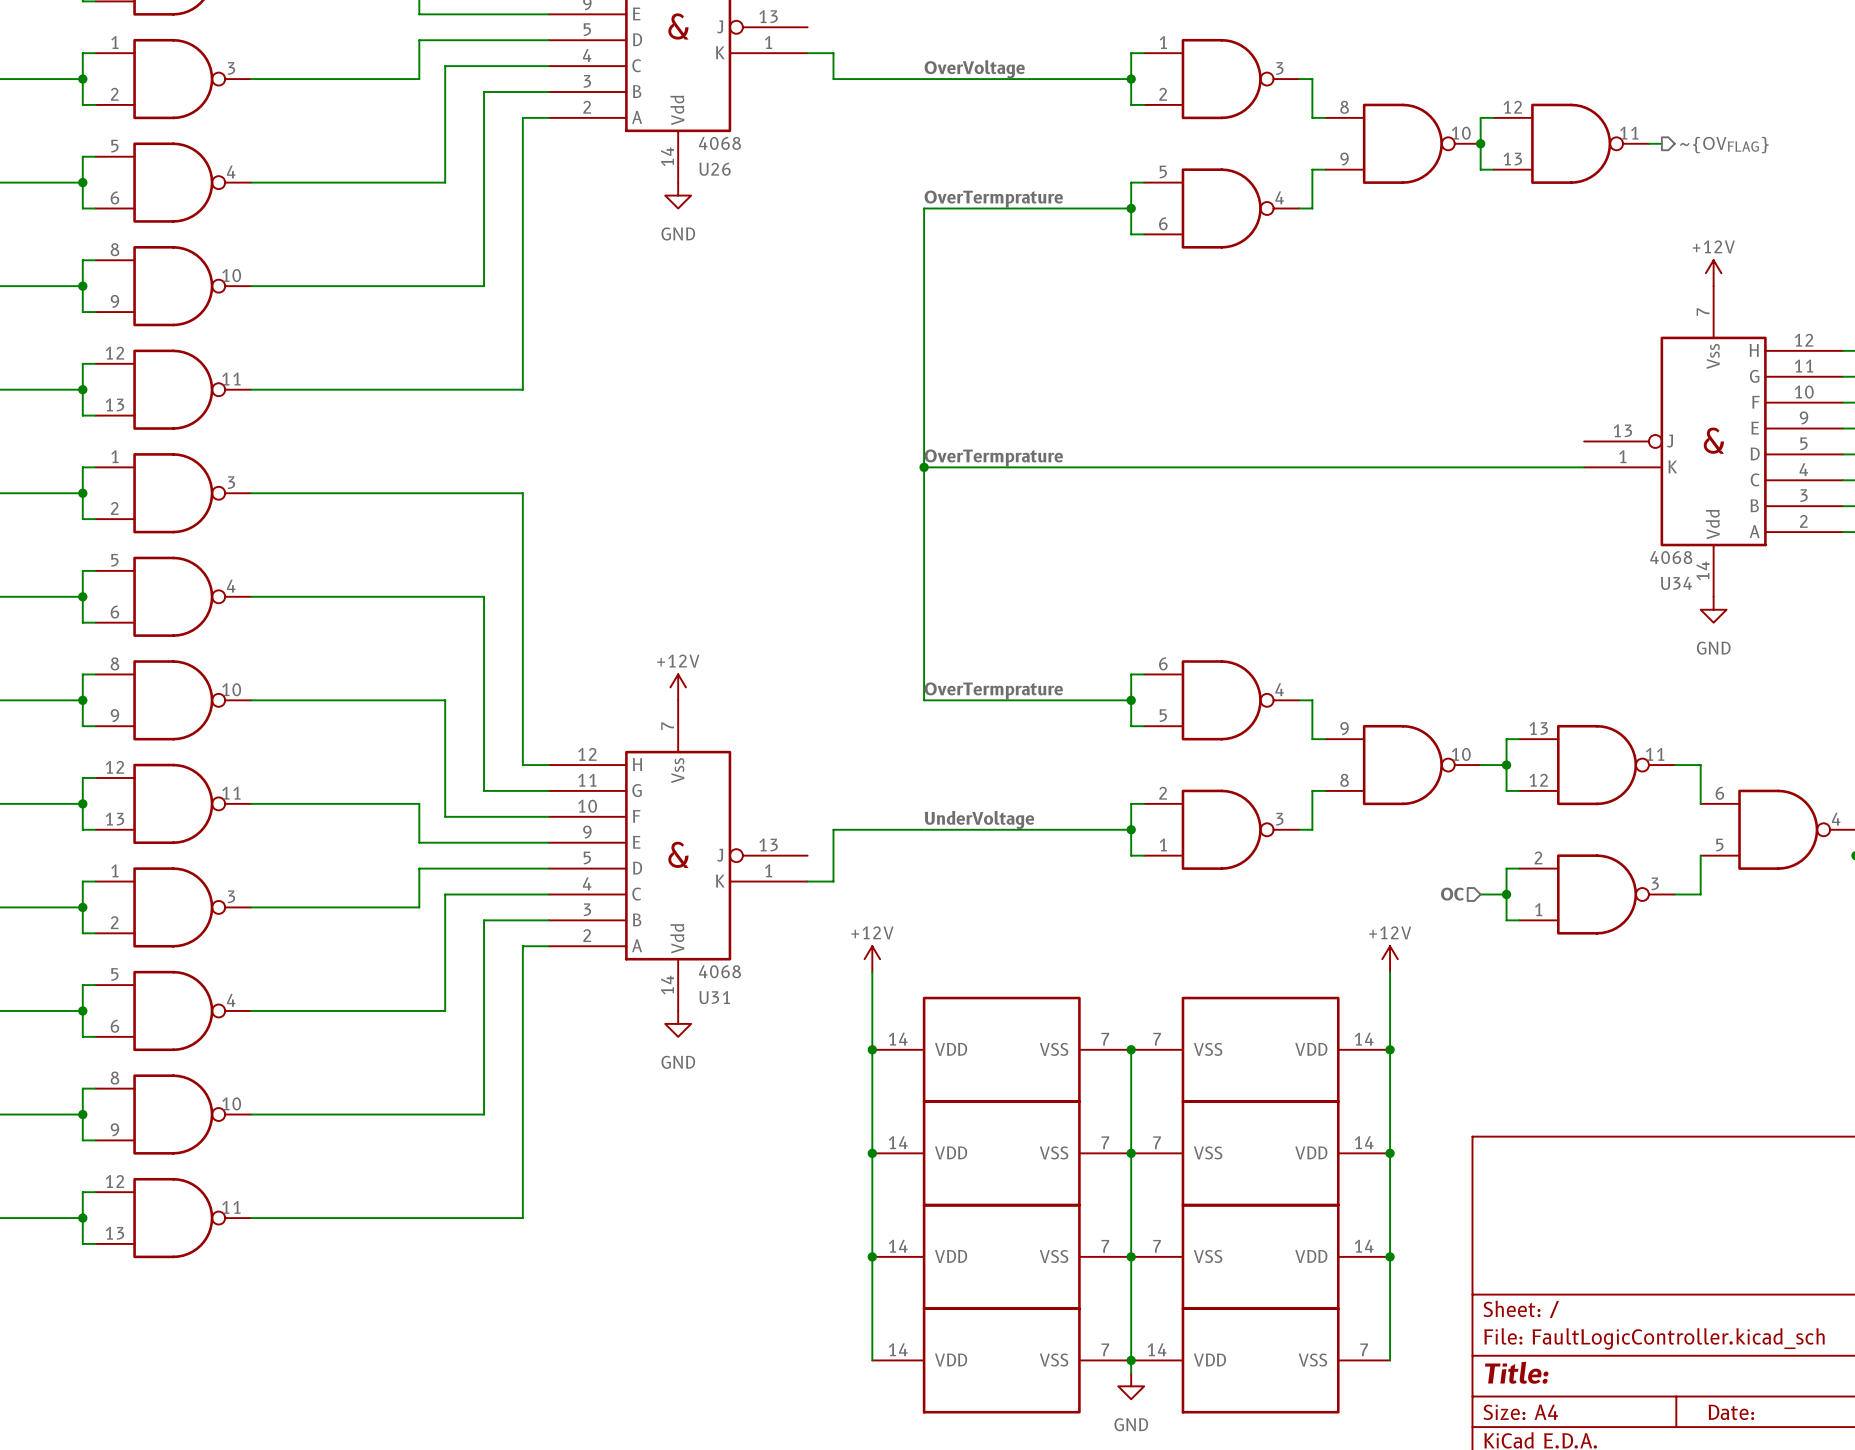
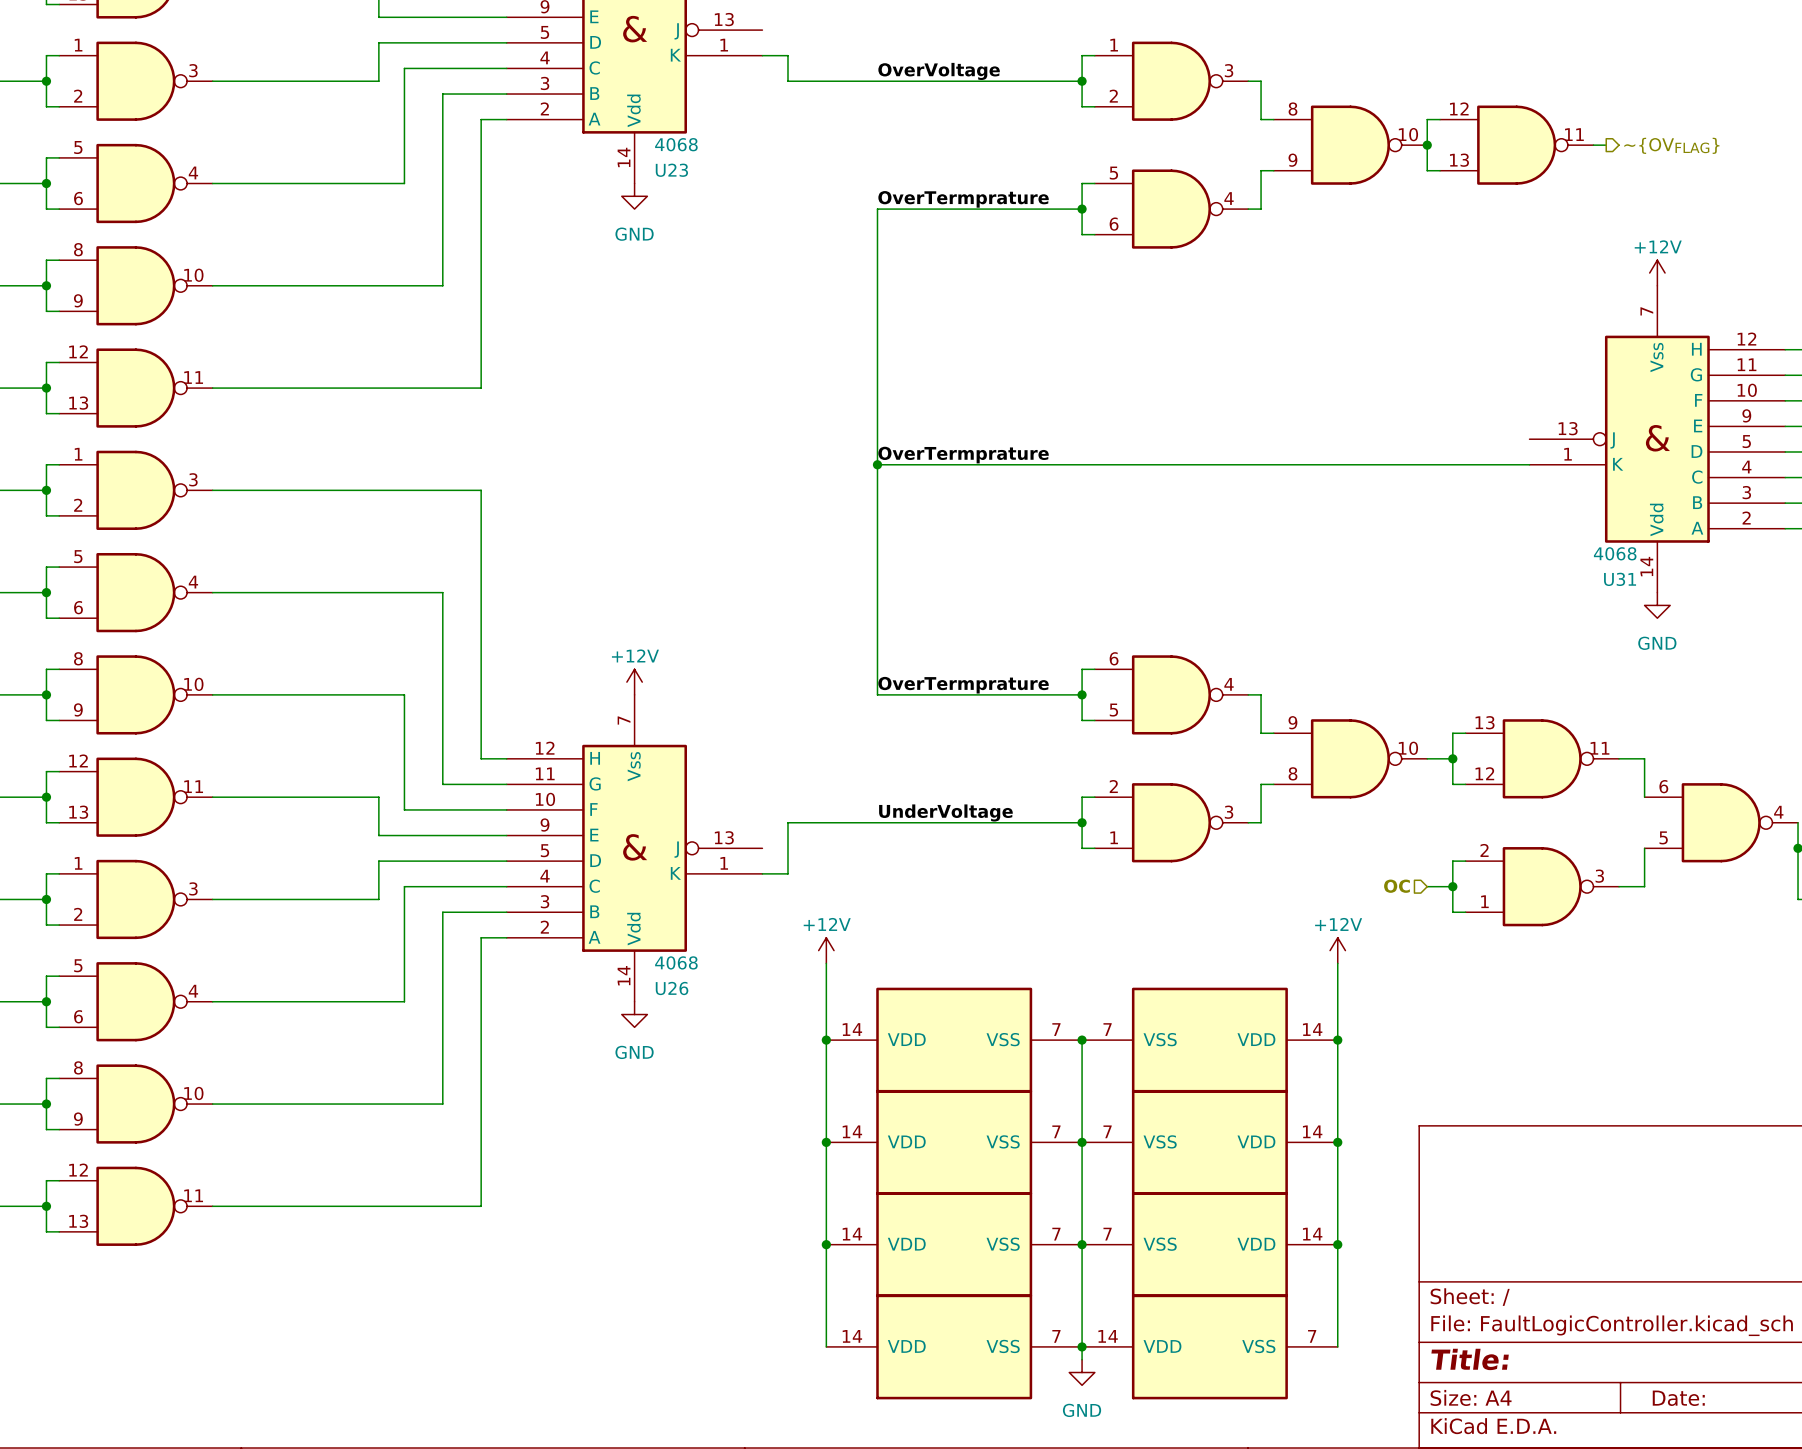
U26 name: U26 (715, 169) -> U23 (671, 170)
U34 name: U34 (1676, 583) -> U31 (1620, 579)
U31 name: U31 (714, 997) -> U26 (672, 988)

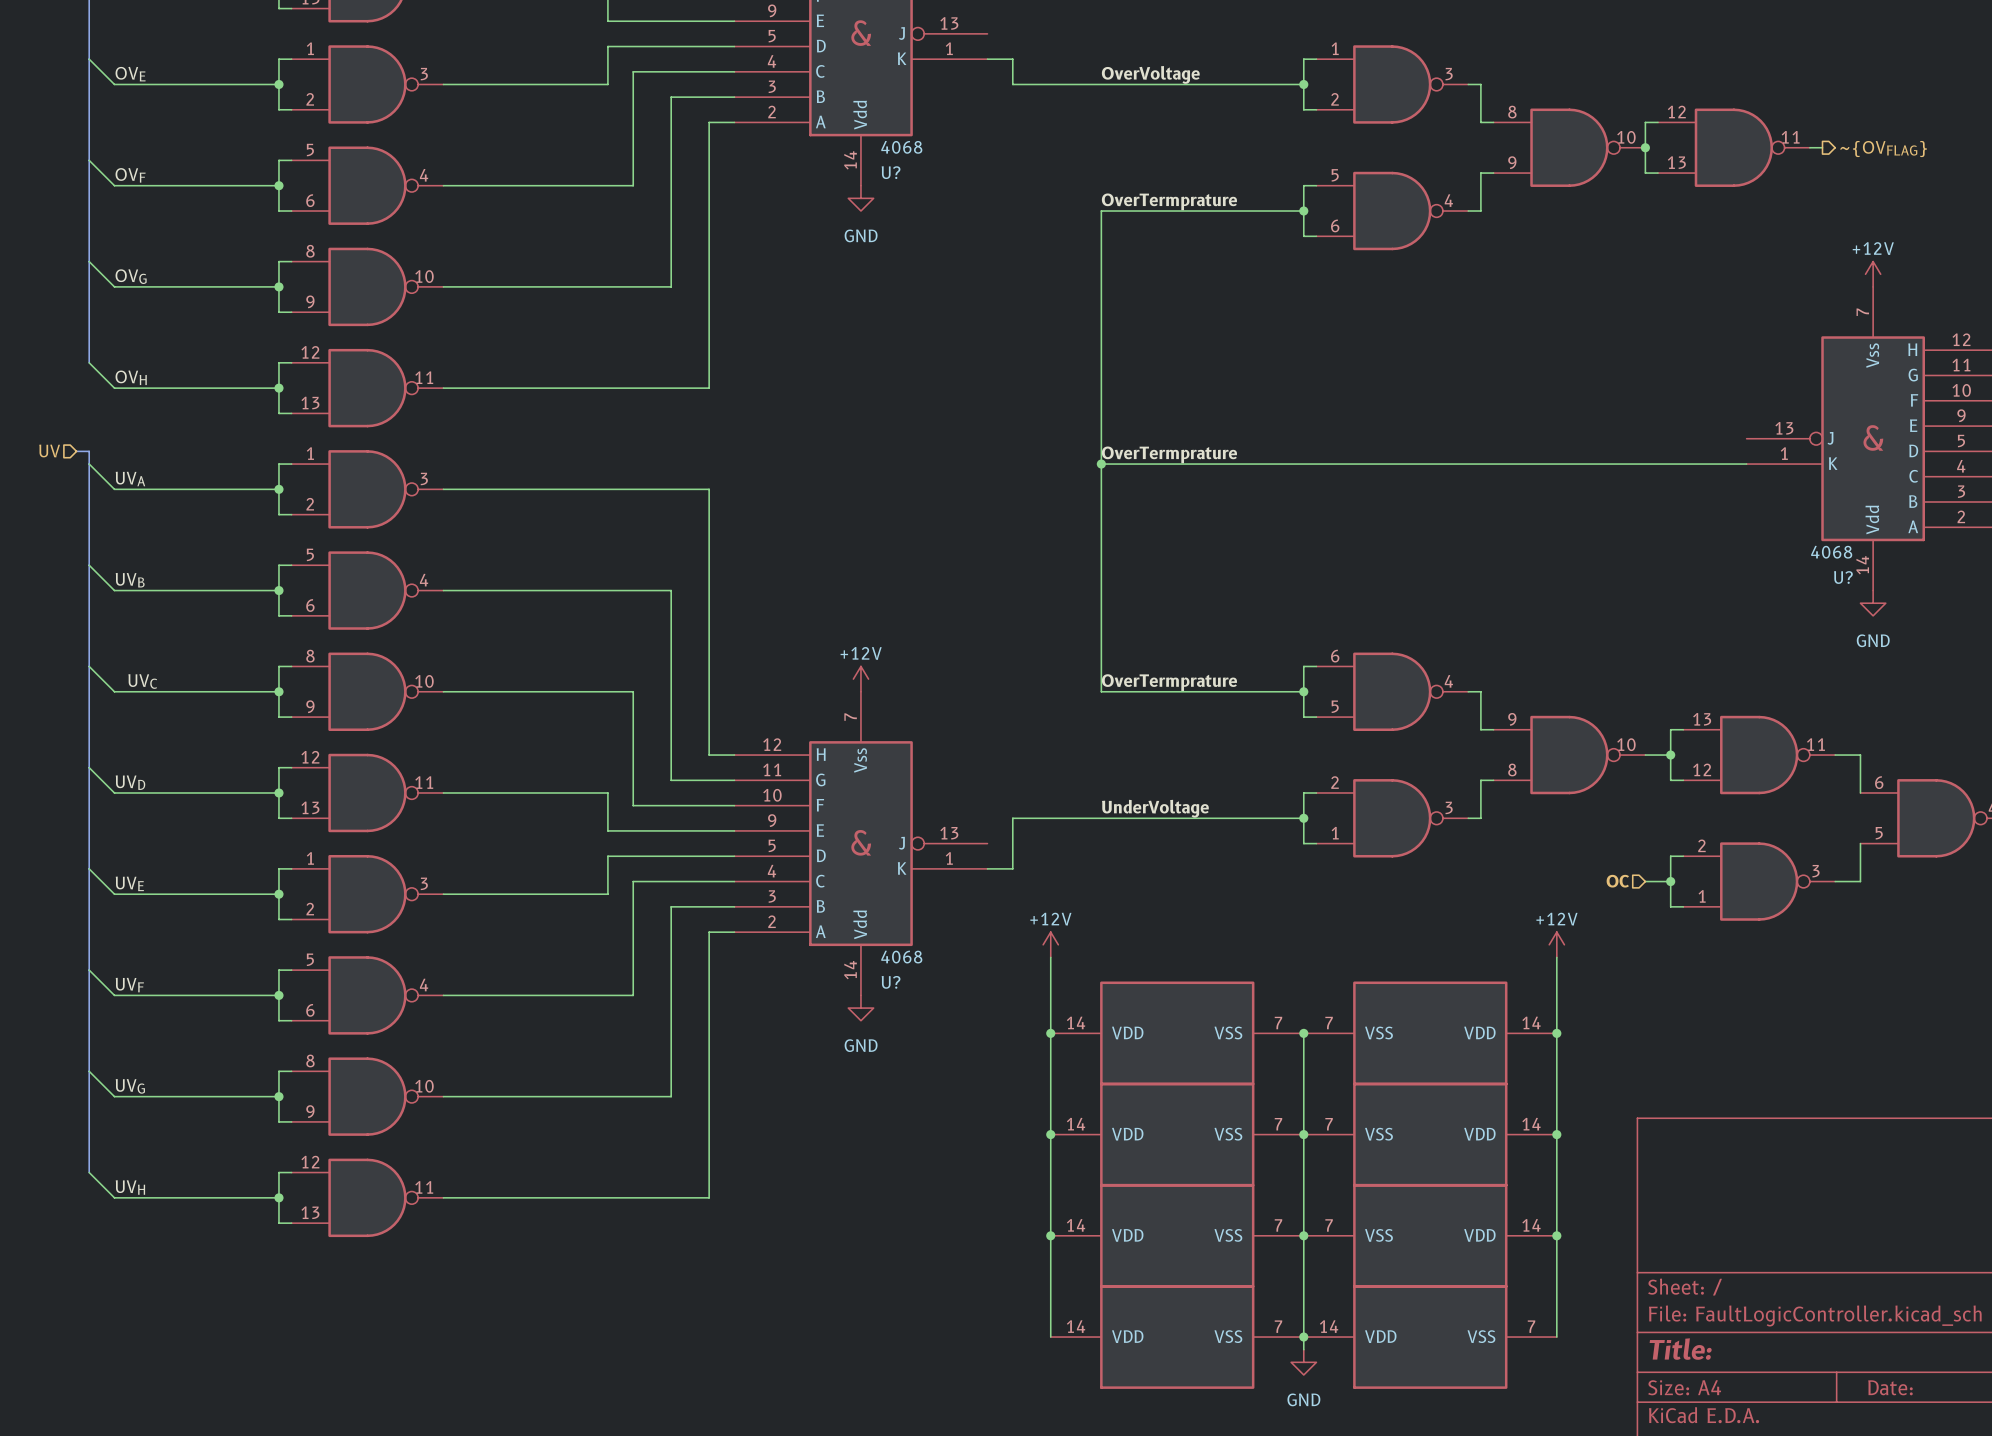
U23 name: U23 (671, 170) -> U? (891, 172)
U31 name: U31 (1620, 579) -> U? (1843, 577)
U26 name: U26 (672, 988) -> U? (891, 982)

